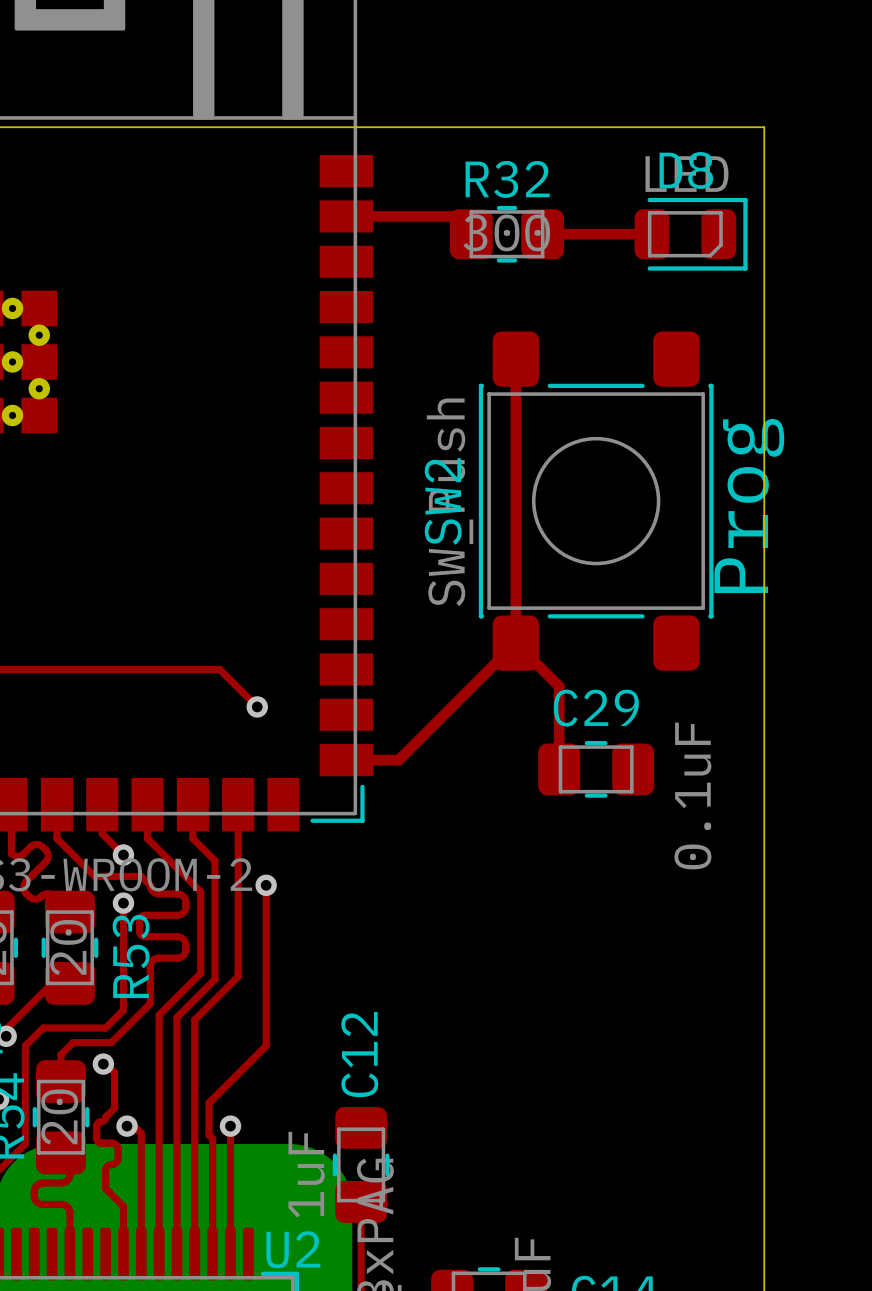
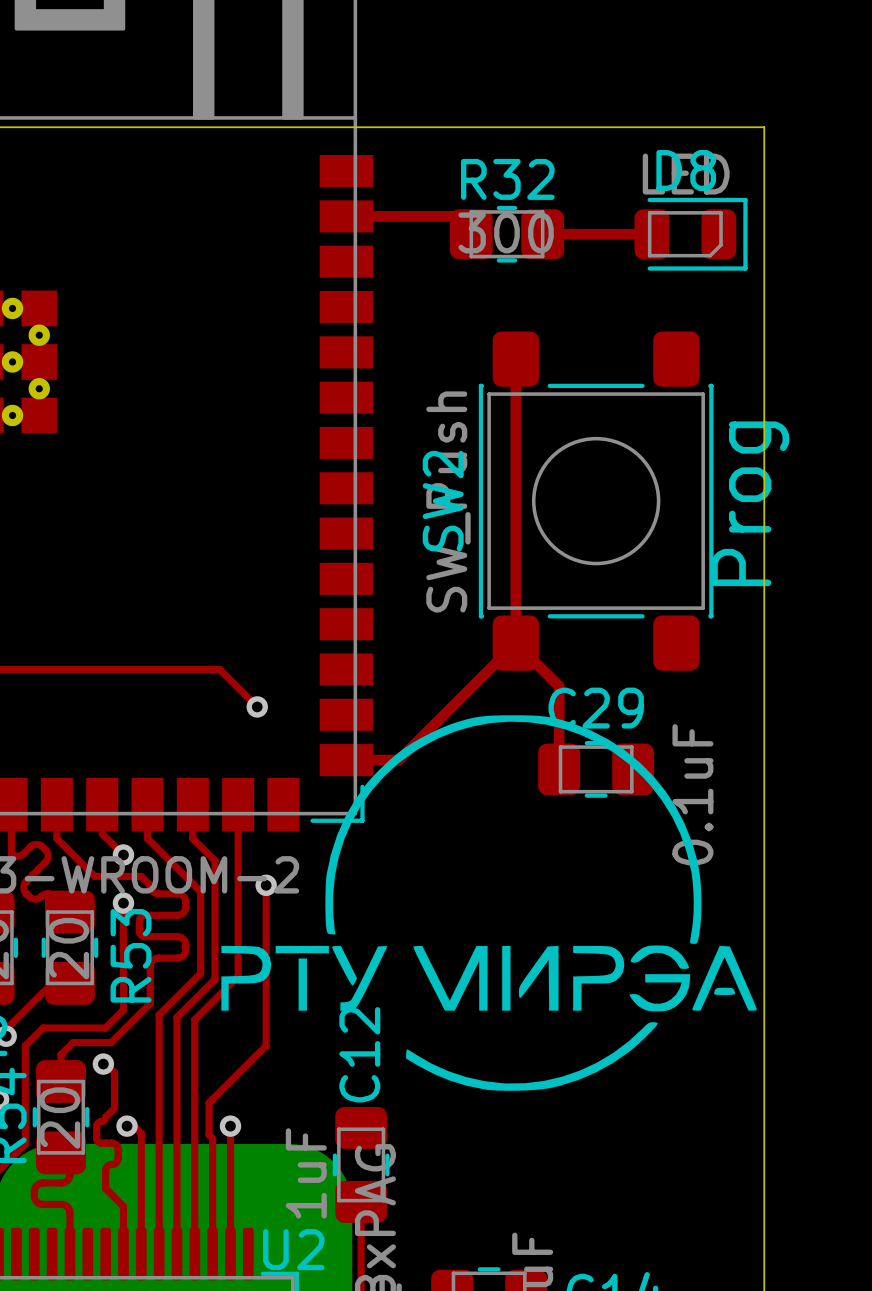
drawing: none -> [221, 715, 757, 1091]

